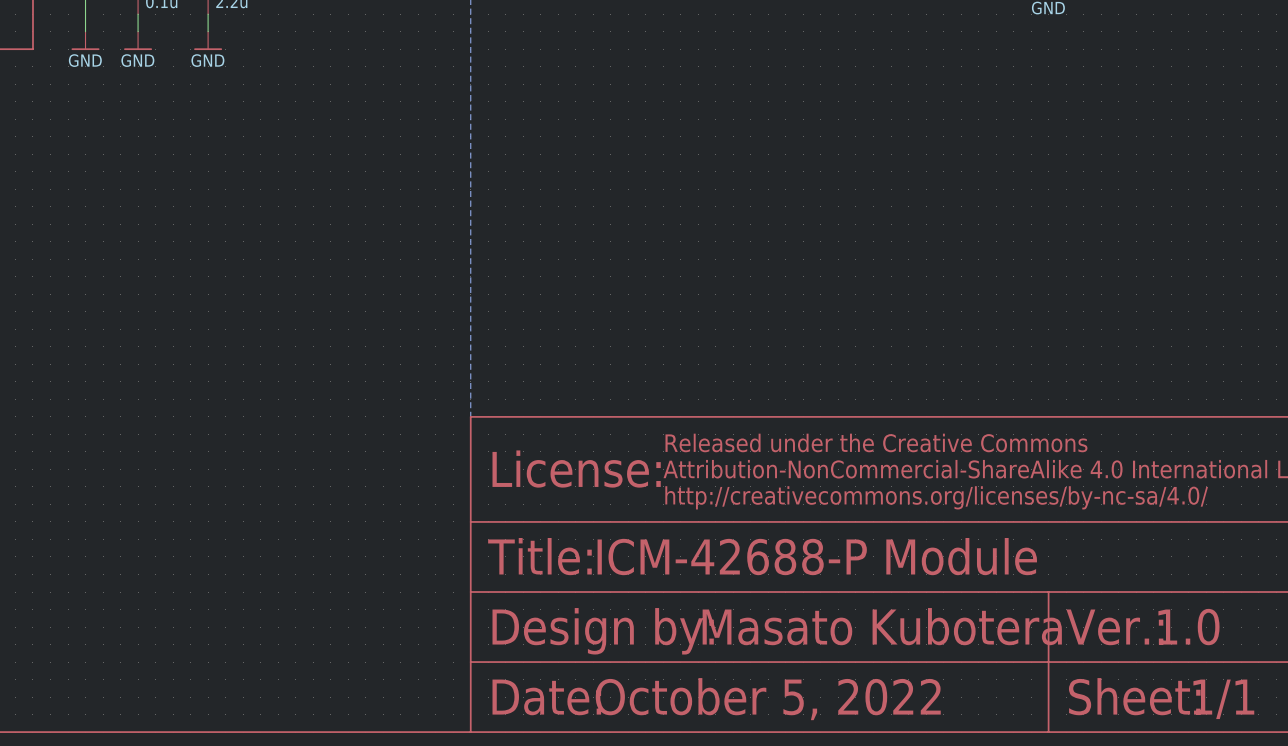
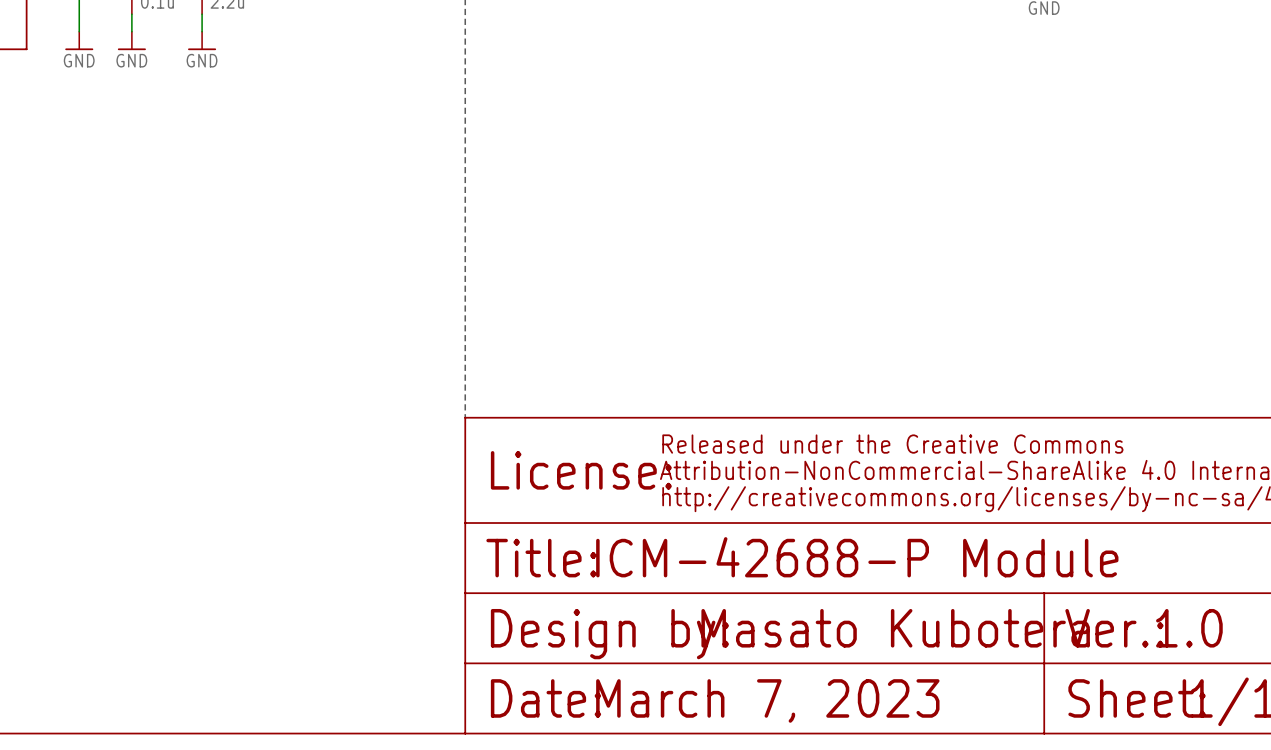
text: October 5, 2022 (768, 699) -> March 7, 2023 (767, 700)

